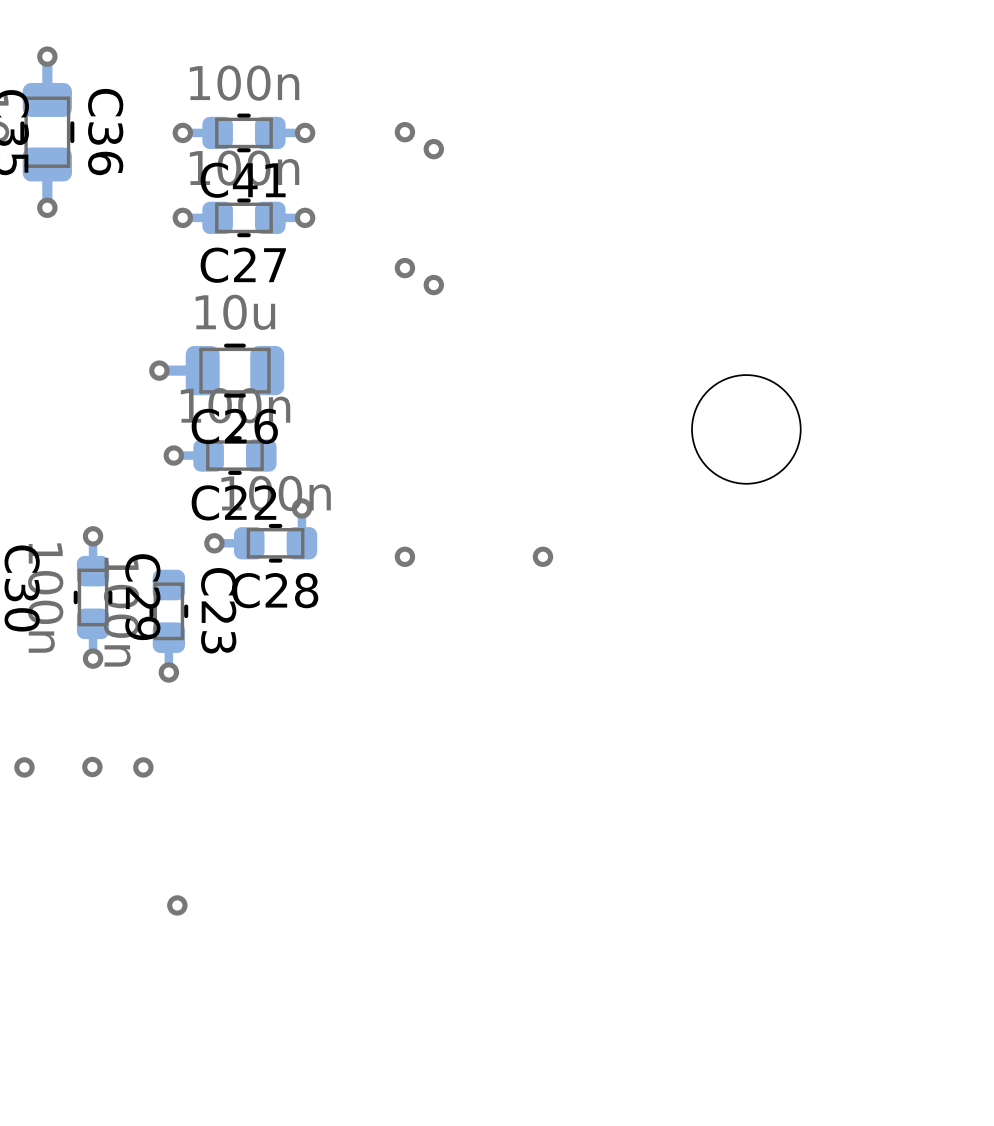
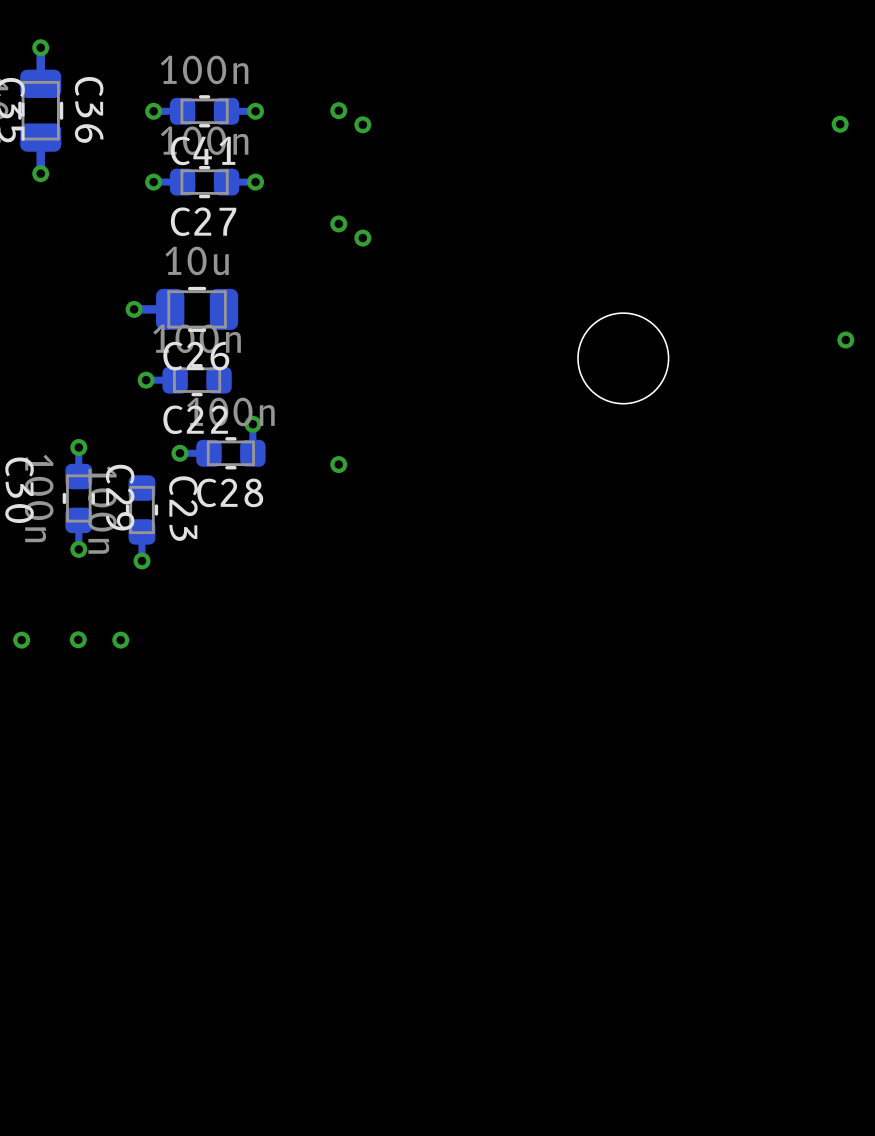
via: (542, 556) -> none
via: (177, 905) -> none

